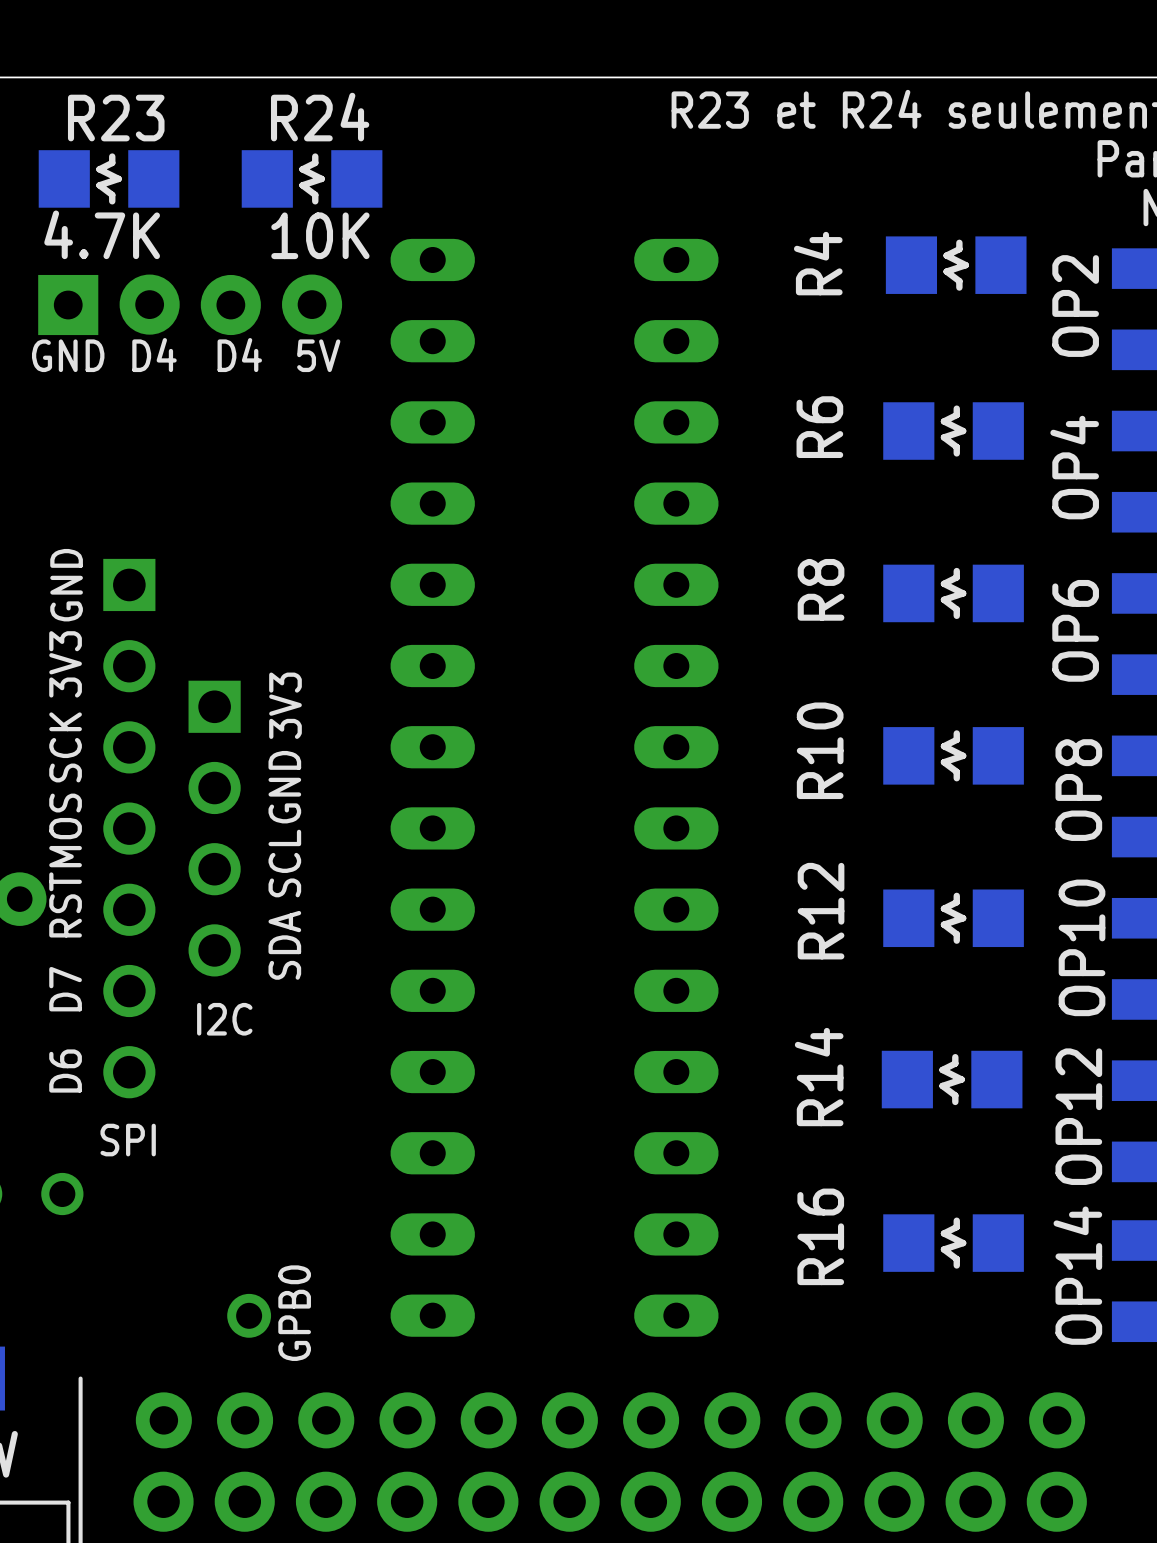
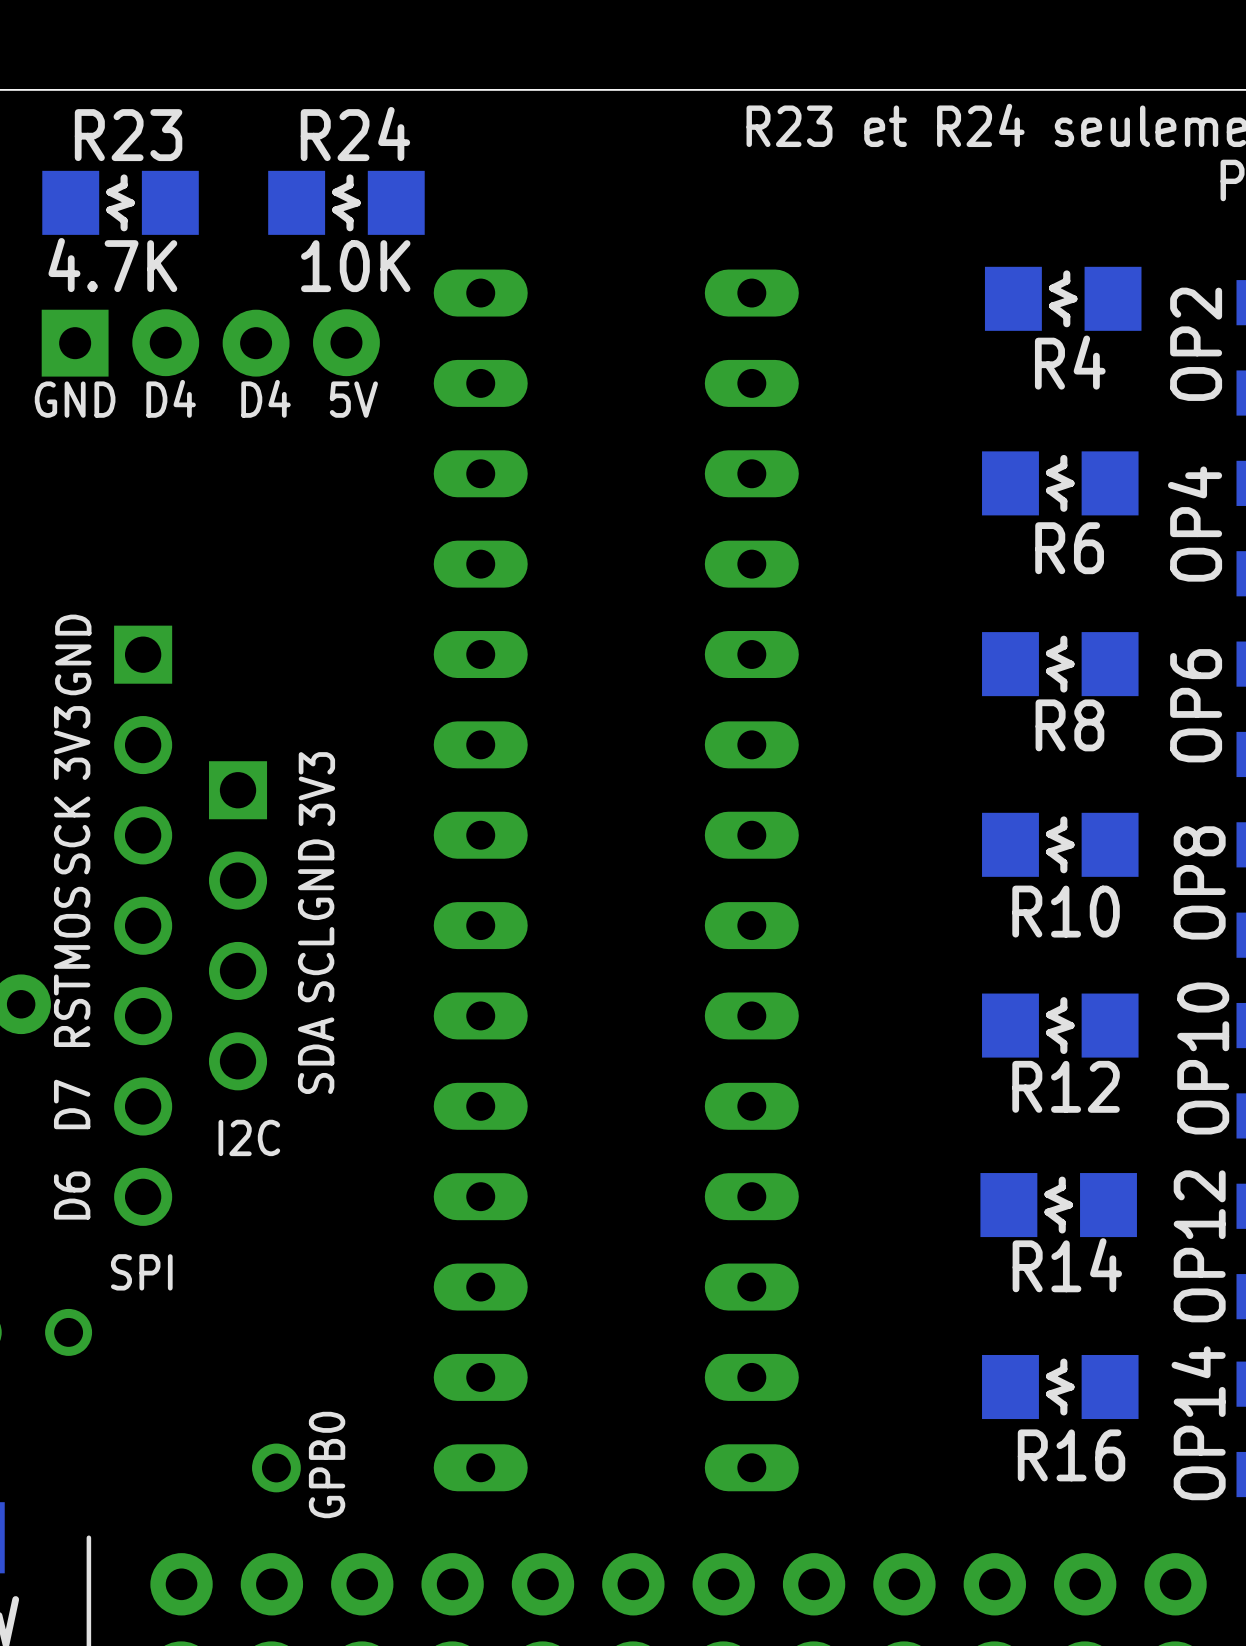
R4 name rotation: 0° (818, 263) -> 90° clockwise (1070, 362)
R4 name position: R4 (818, 263) -> R4 (1070, 362)
R6 name rotation: 0° (819, 427) -> 90° clockwise (1069, 548)
R6 name position: R6 (819, 427) -> R6 (1069, 548)
R8 name rotation: 0° (821, 589) -> 90° clockwise (1069, 725)
R8 name position: R8 (821, 589) -> R8 (1069, 725)
R10 name rotation: 0° (820, 750) -> 90° clockwise (1066, 911)
R10 name position: R10 (820, 750) -> R10 (1066, 911)
R12 name rotation: 0° (821, 911) -> 90° clockwise (1066, 1086)
R12 name position: R12 (821, 911) -> R12 (1066, 1086)
R14 name rotation: 0° (819, 1077) -> 90° clockwise (1067, 1265)
R14 name position: R14 (819, 1077) -> R14 (1067, 1265)
R16 name rotation: 0° (820, 1236) -> 90° clockwise (1071, 1455)
R16 name position: R16 (820, 1236) -> R16 (1071, 1455)

